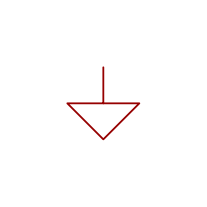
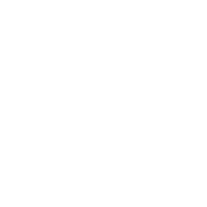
power symbol: (103, 103) -> none

